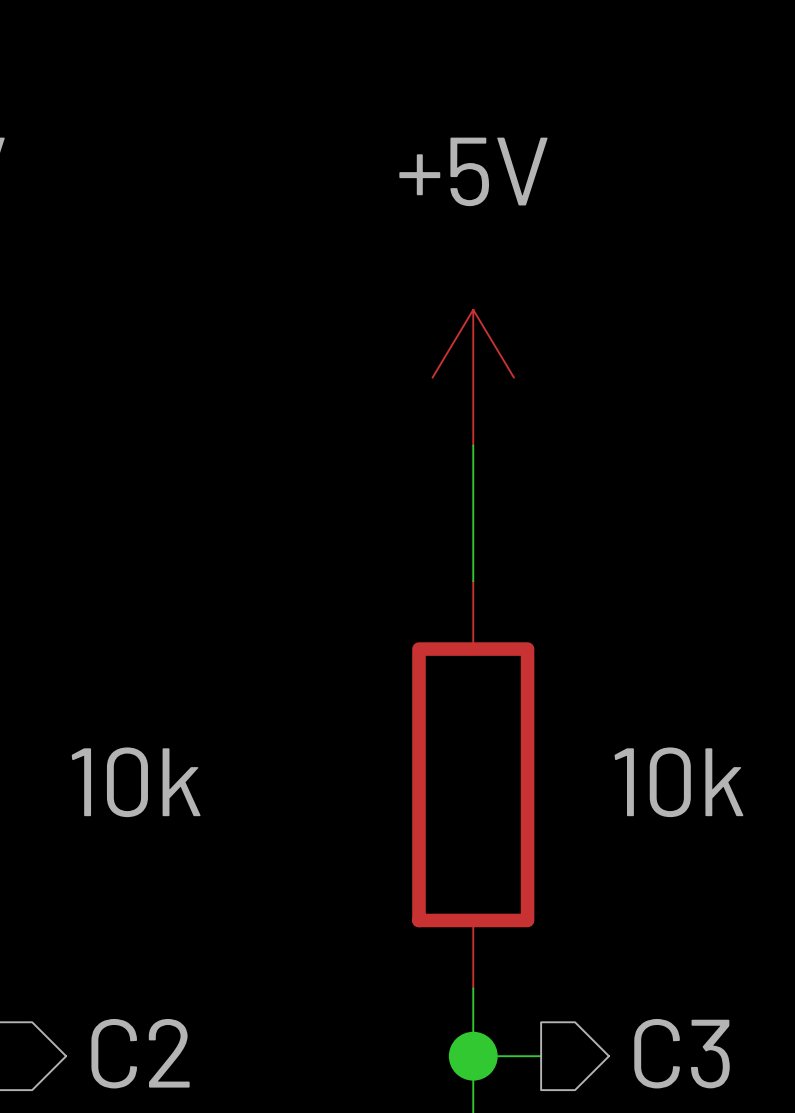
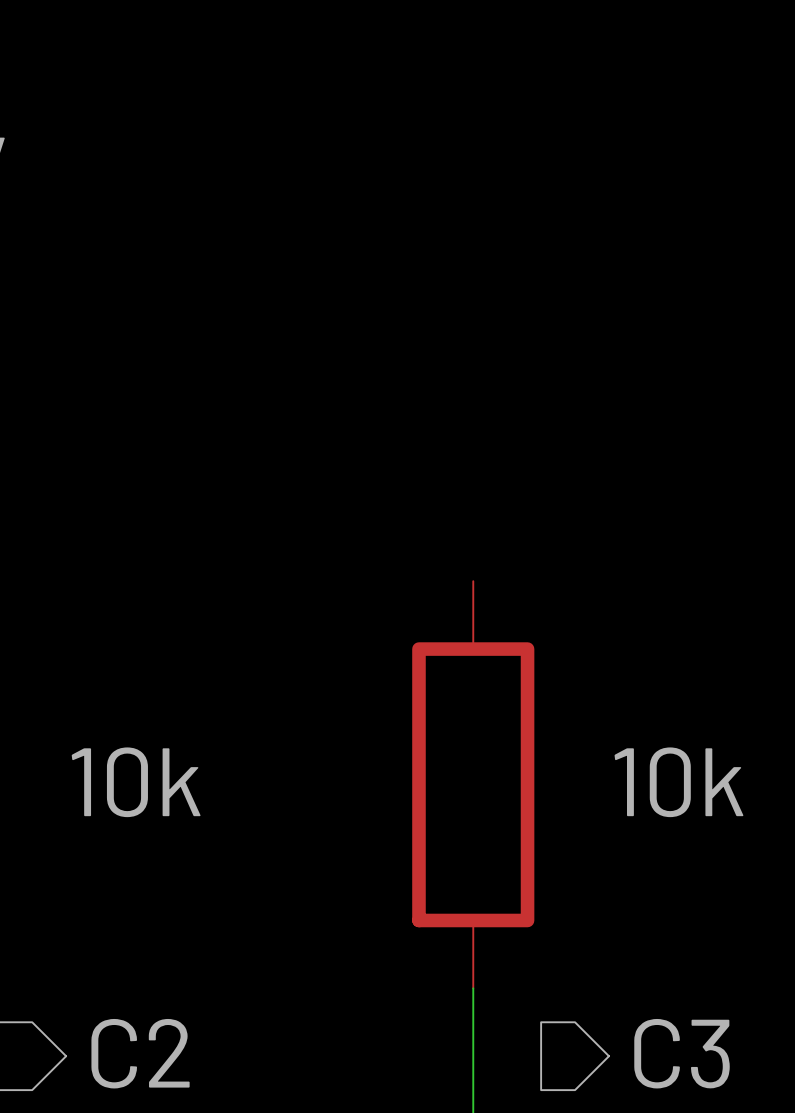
power symbol: +5V (473, 377) -> none
wire: (473, 445) (473, 581) -> none
wire: (473, 1056) (541, 1056) -> none
junction: (473, 1056) -> none

